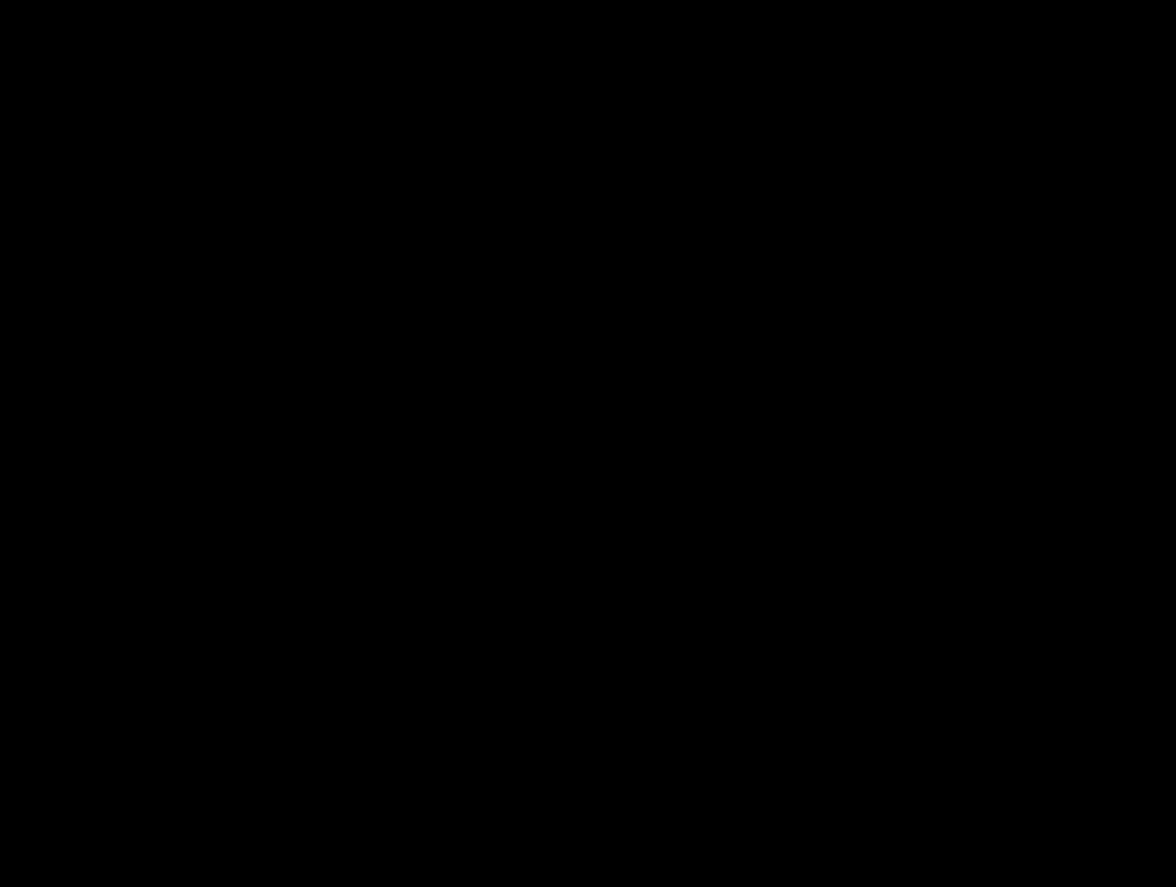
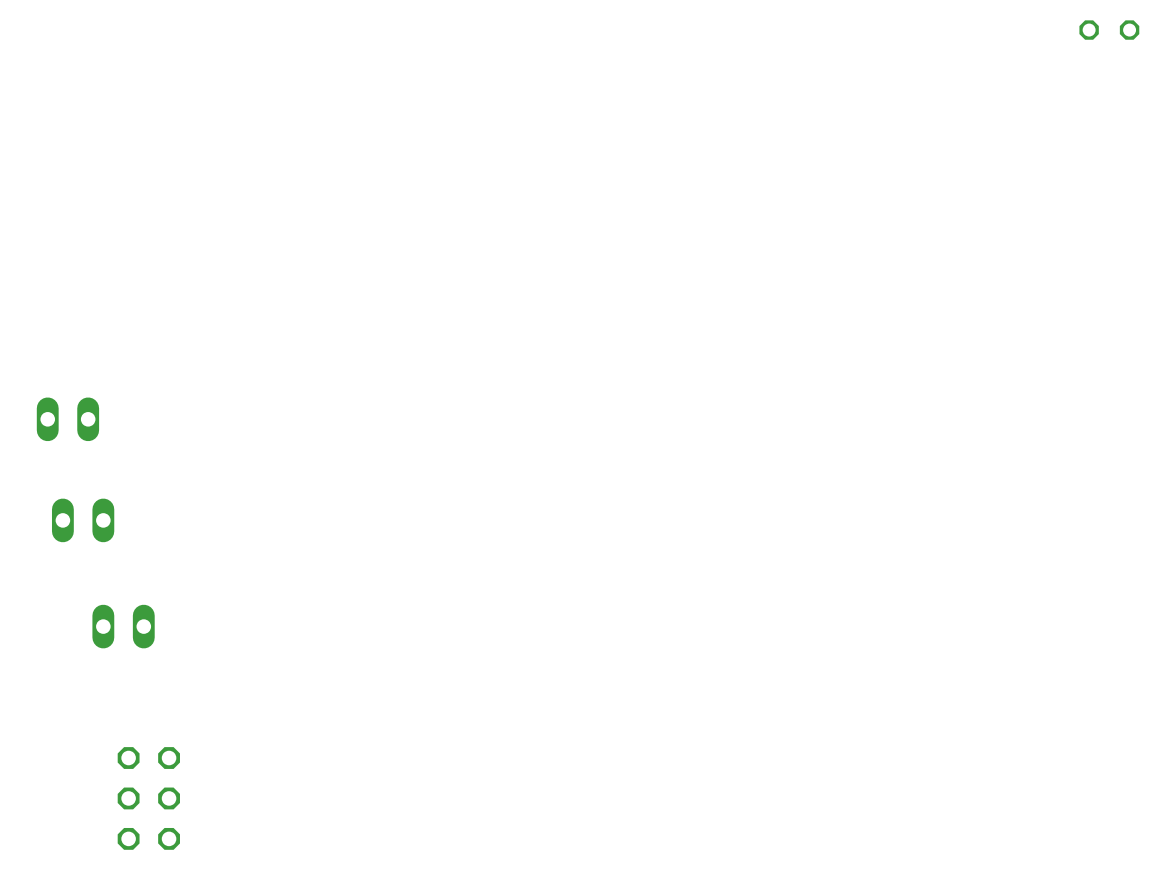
part: none -> (1109, 30)
part: none -> (67, 419)
part: none -> (83, 520)
part: none -> (123, 626)
part: none -> (148, 798)

